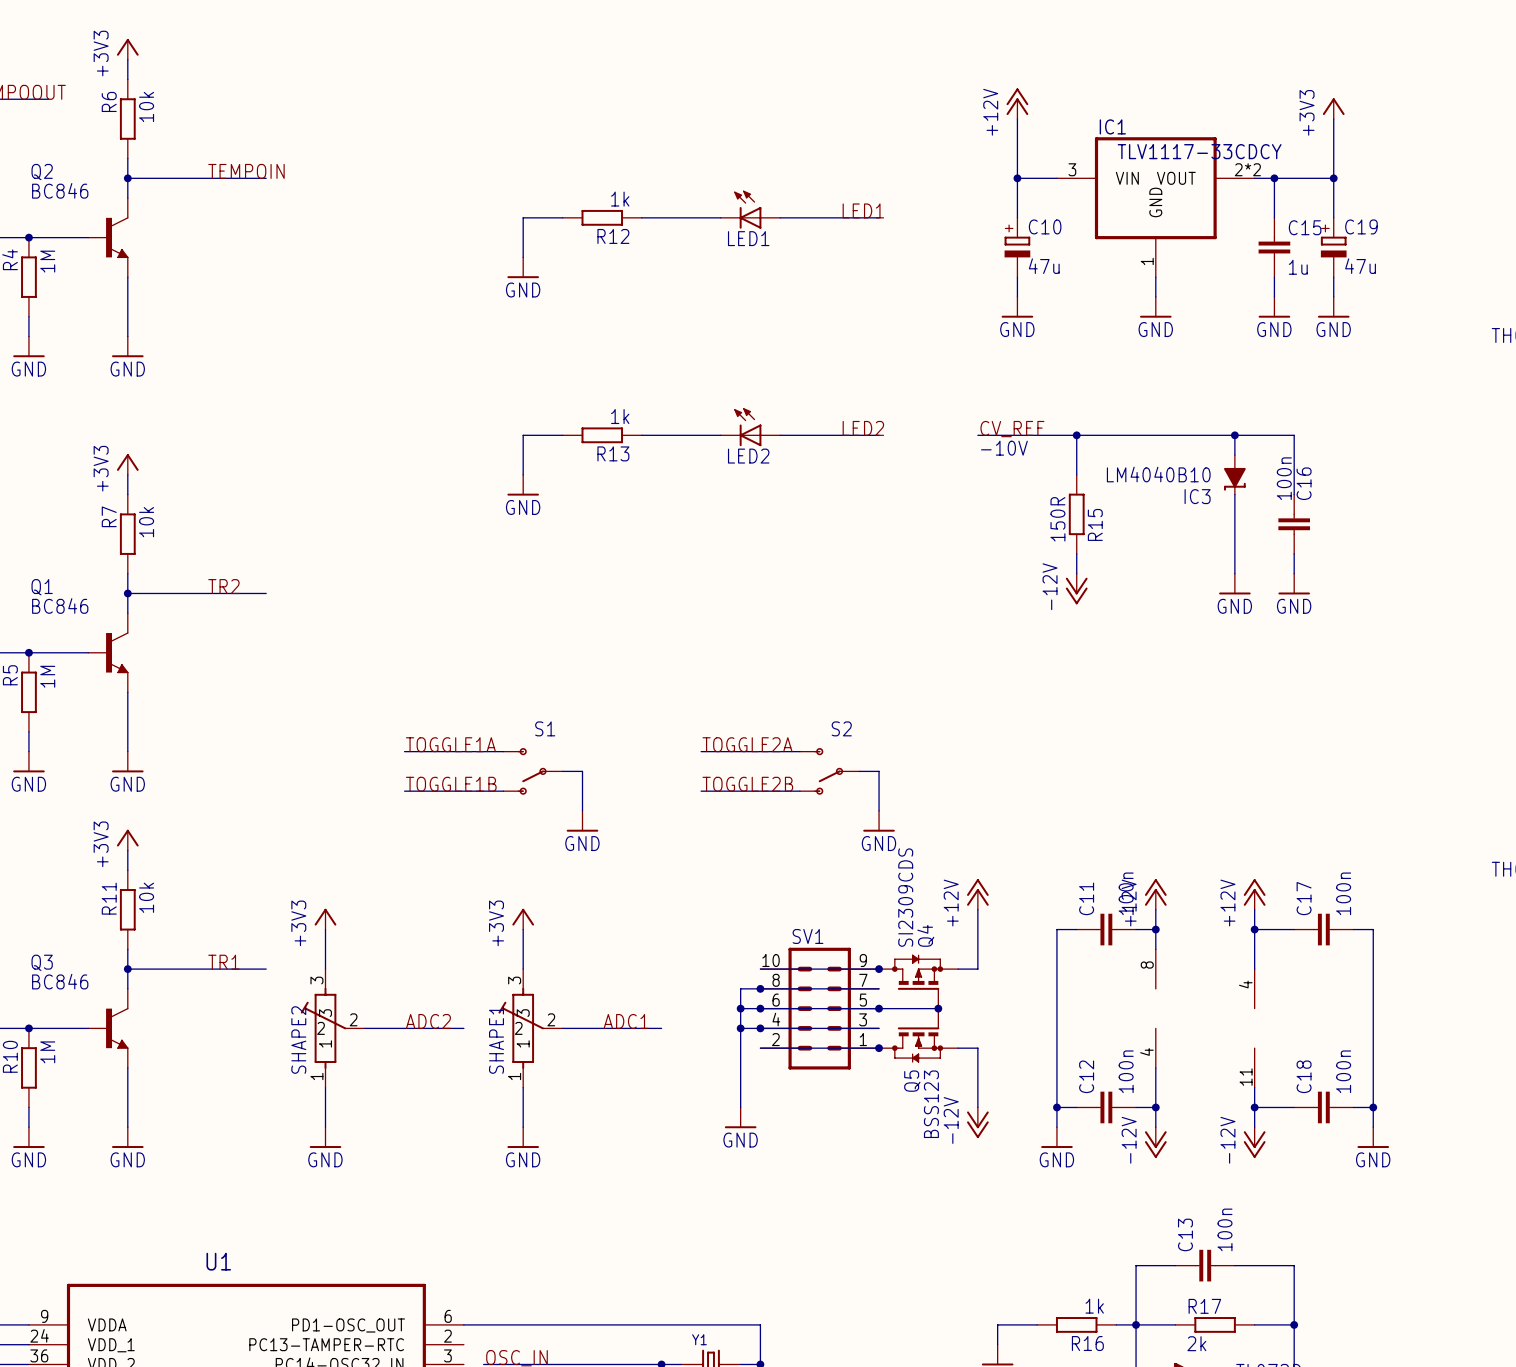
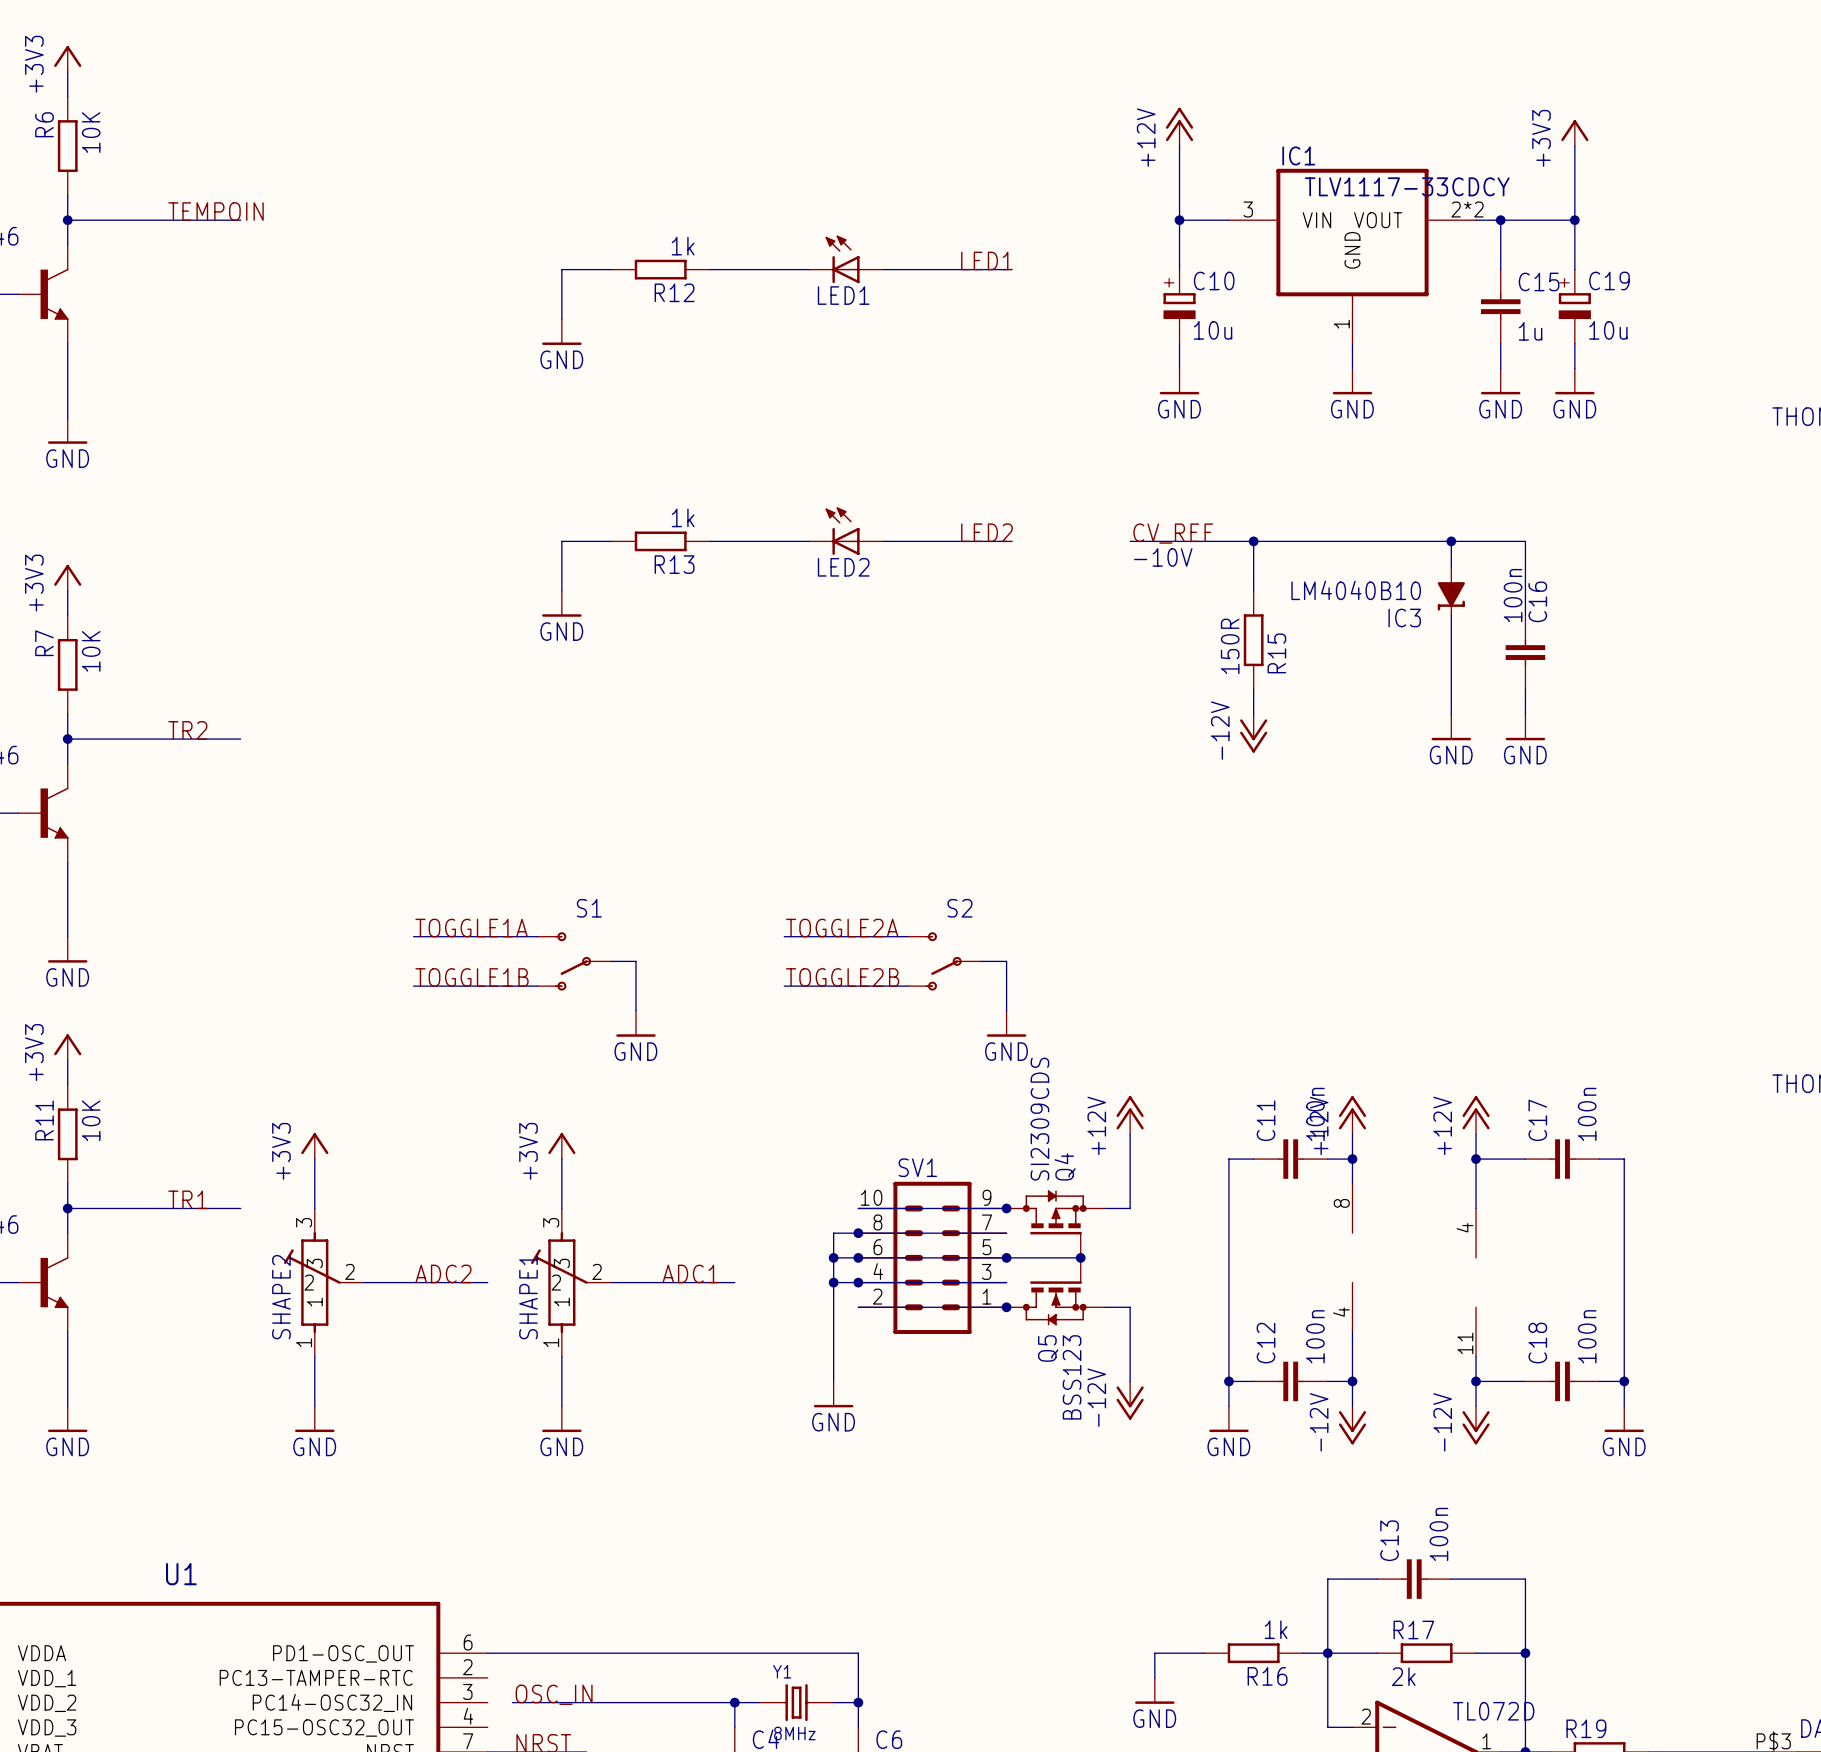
R6 value: 10k (146, 106) -> 10K (91, 132)
C10 value: 47u (1044, 266) -> 10u (1213, 330)
C19 value: 47u (1360, 266) -> 10u (1608, 330)
R7 value: 10k (146, 522) -> 10K (91, 651)
R11 value: 10k (146, 897) -> 10K (91, 1120)

